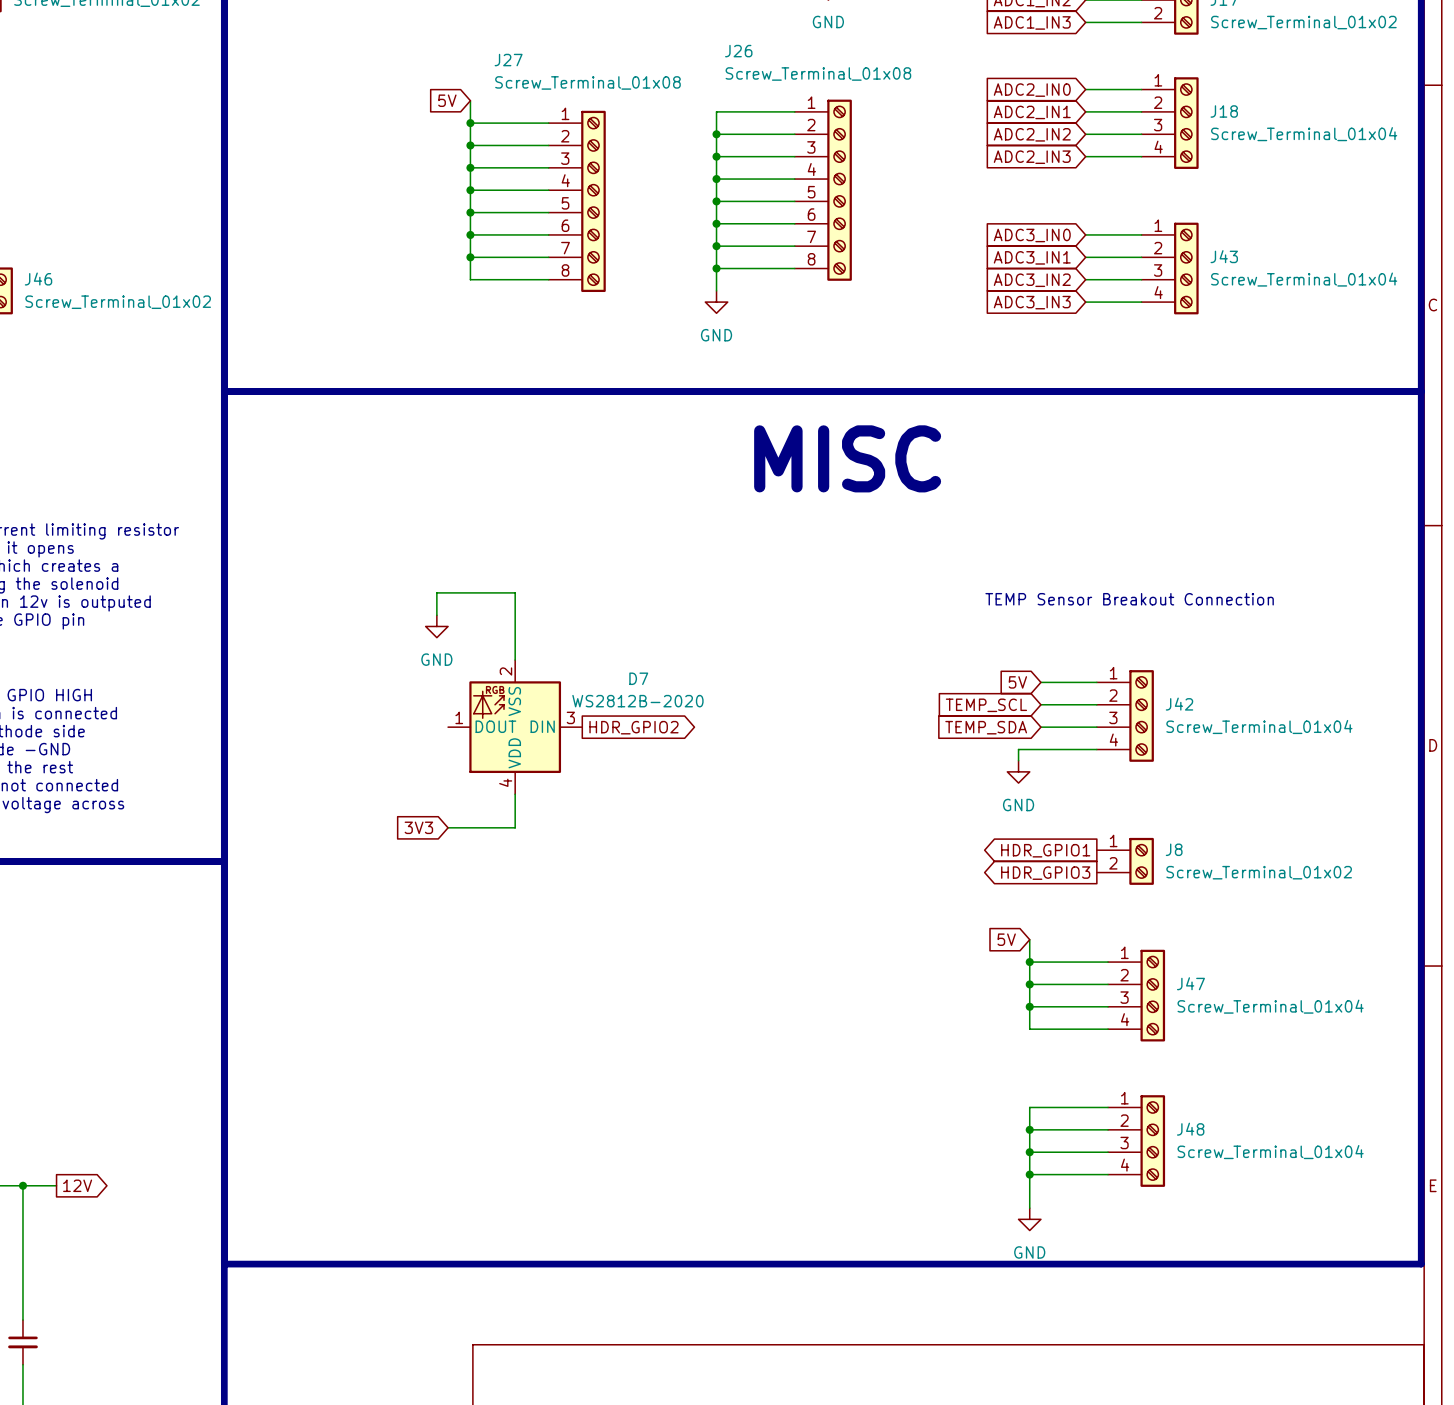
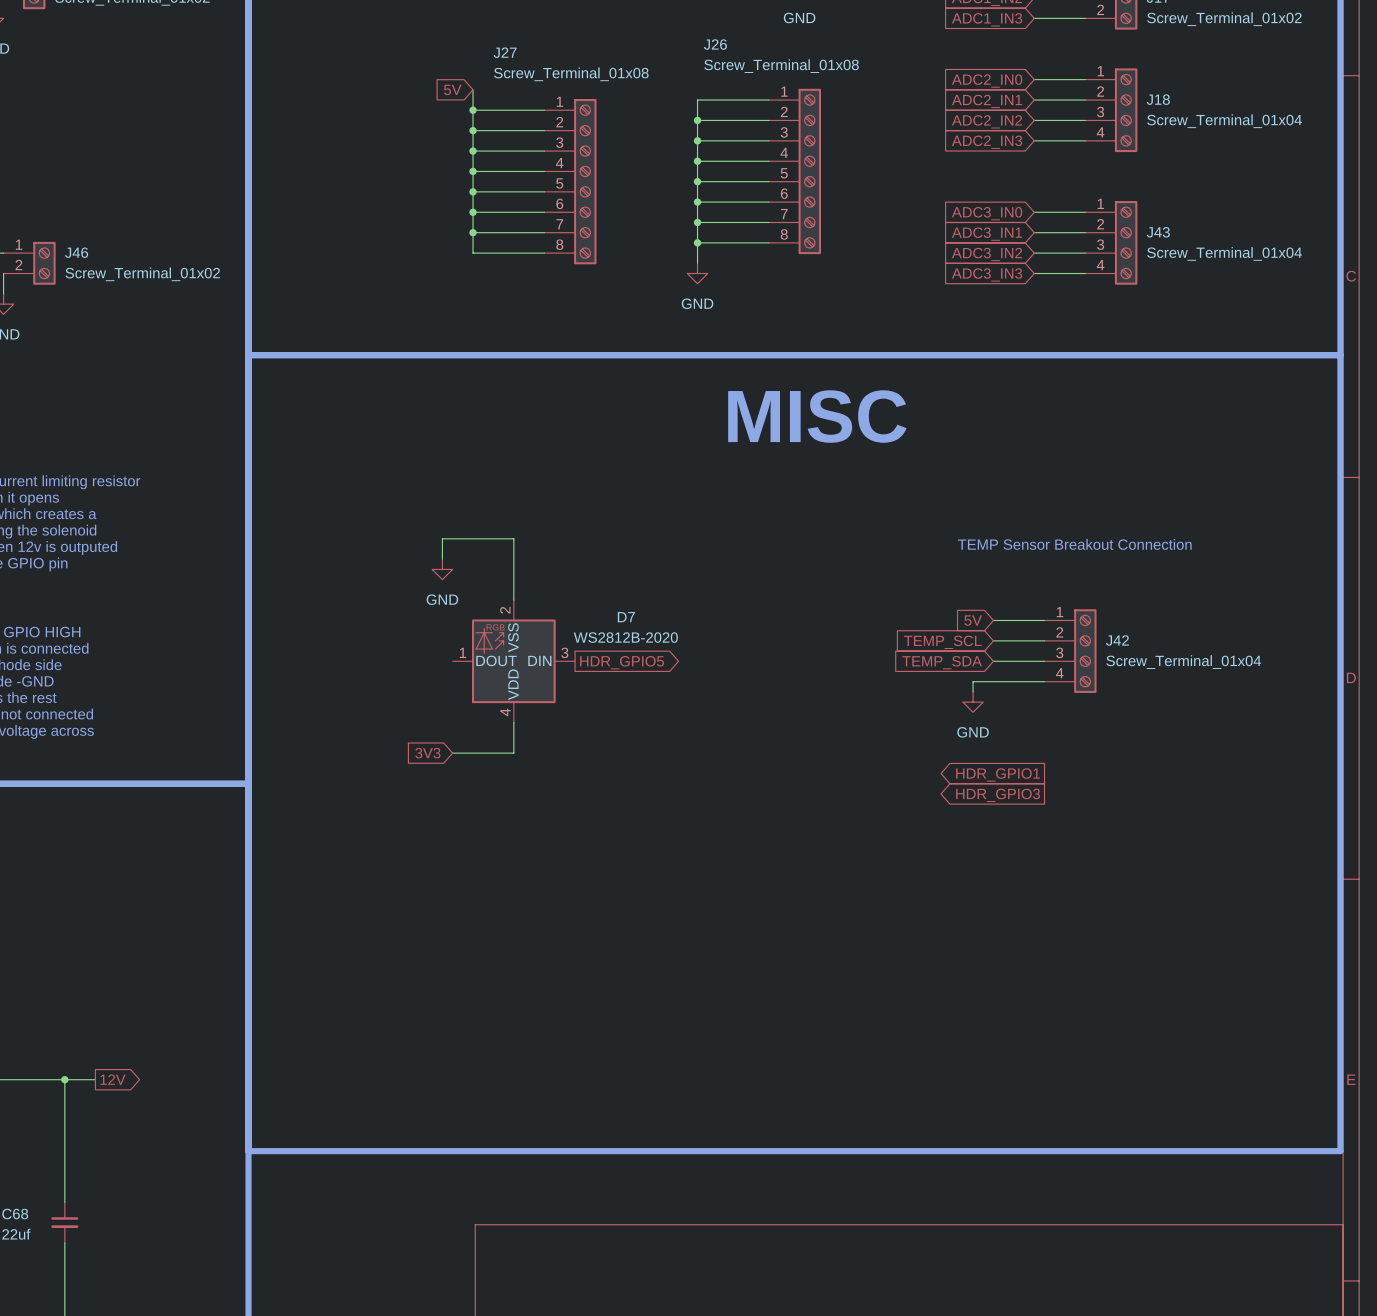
global label: HDR_GPIO2 (633, 727) -> HDR_GPIO5 (622, 662)
J8: Screw_Terminal_01x02 (1125, 861) -> none
global label: 5V (1006, 939) -> none
wire: (1029, 939) (1029, 1029) (1108, 1029) -> none
wire: (1029, 962) (1108, 962) -> none
junction: (1029, 962) -> none
wire: (1029, 984) (1108, 984) -> none
junction: (1029, 984) -> none
J47: Screw_Terminal_01x04 (1136, 995) -> none
wire: (1029, 1006) (1108, 1006) -> none
junction: (1029, 1006) -> none
wire: (1108, 1107) (1029, 1107) (1029, 1208) -> none
wire: (1029, 1129) (1108, 1129) -> none
junction: (1029, 1129) -> none
J48: Screw_Terminal_01x04 (1136, 1141) -> none
wire: (1029, 1152) (1108, 1152) -> none
junction: (1029, 1152) -> none
wire: (1029, 1174) (1108, 1174) -> none
junction: (1029, 1174) -> none
power symbol: GND (1029, 1219) -> none

